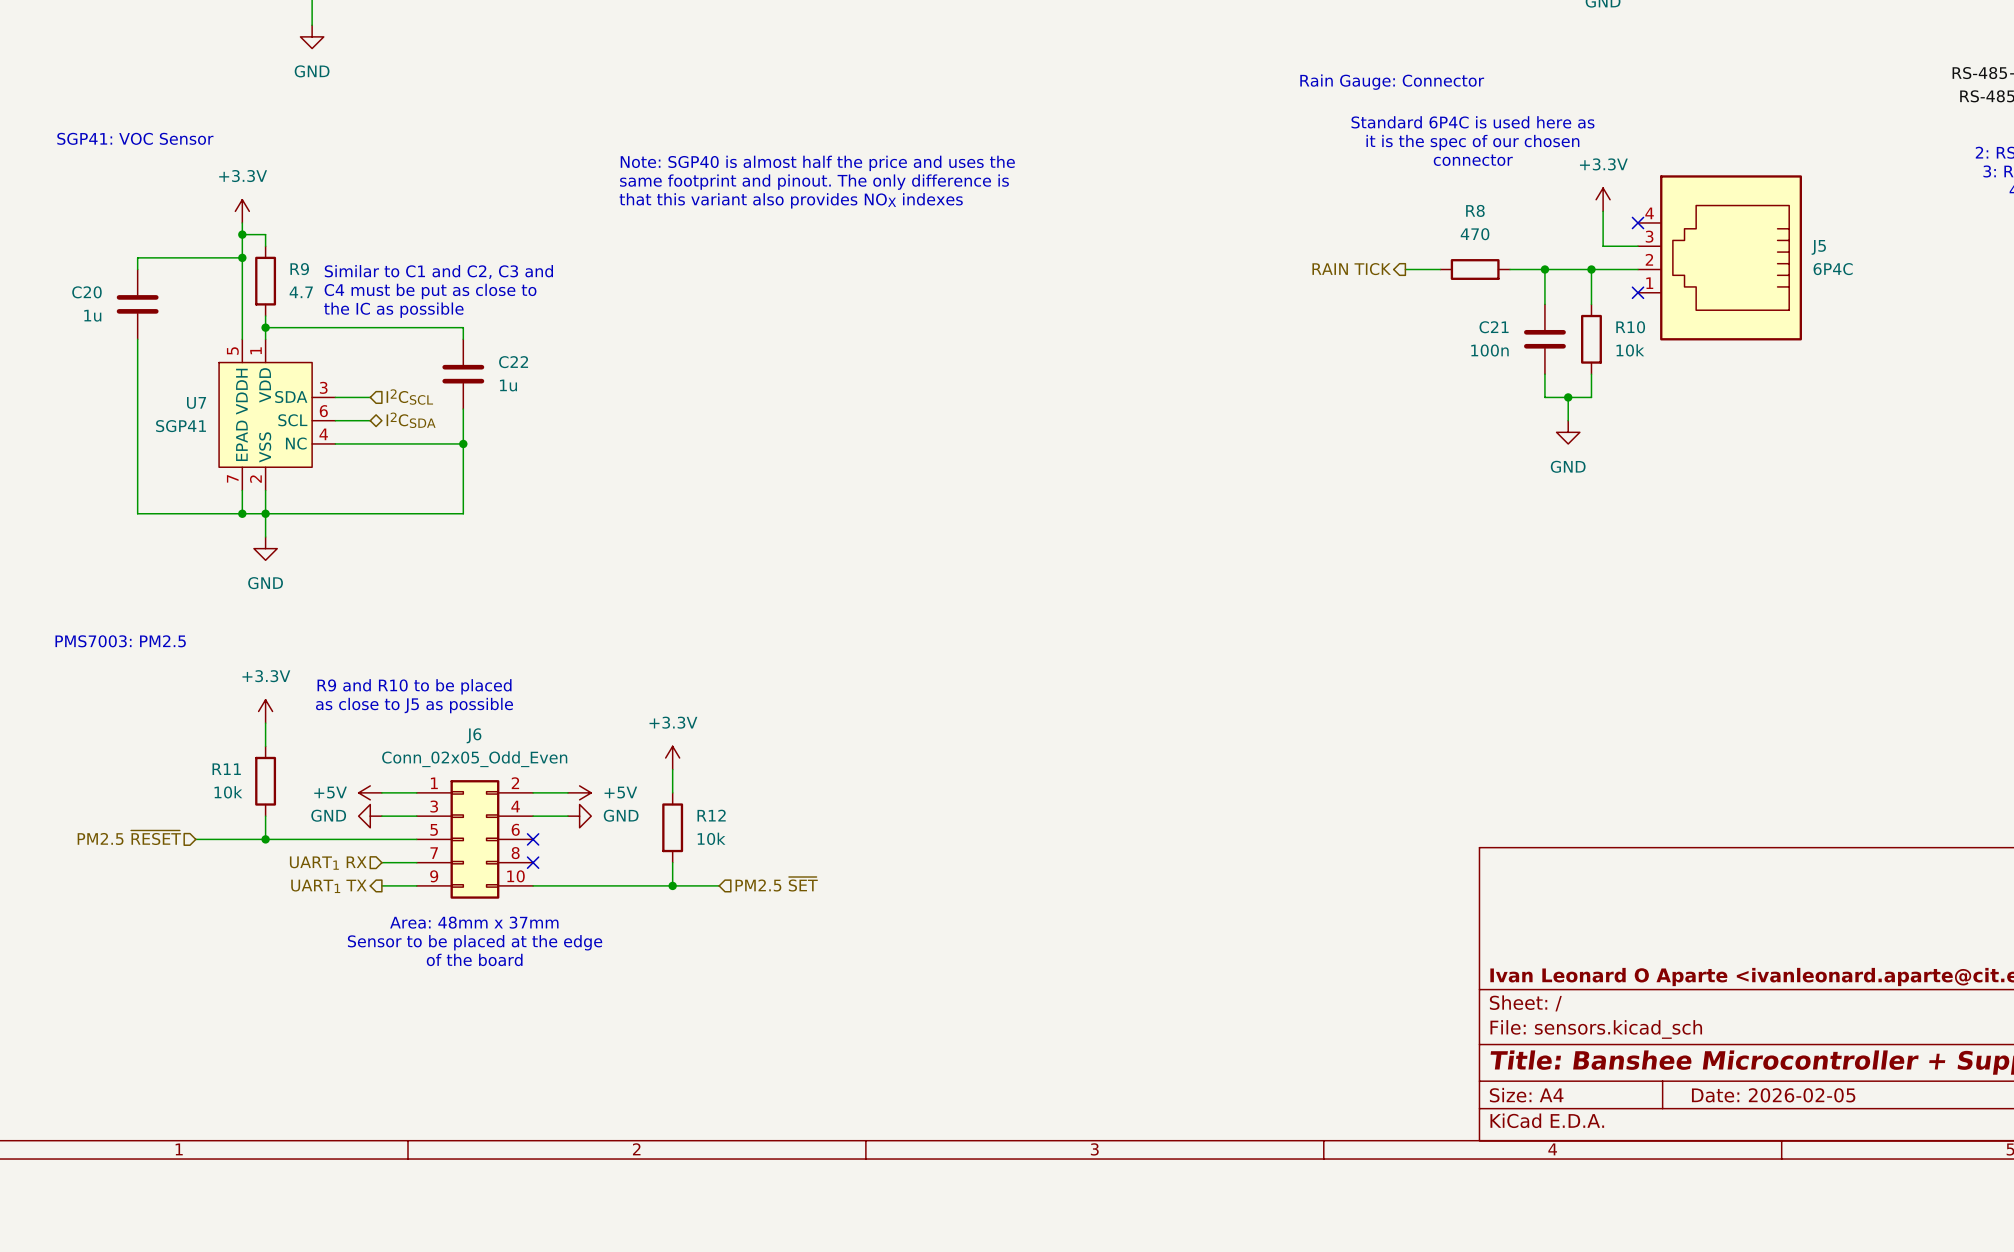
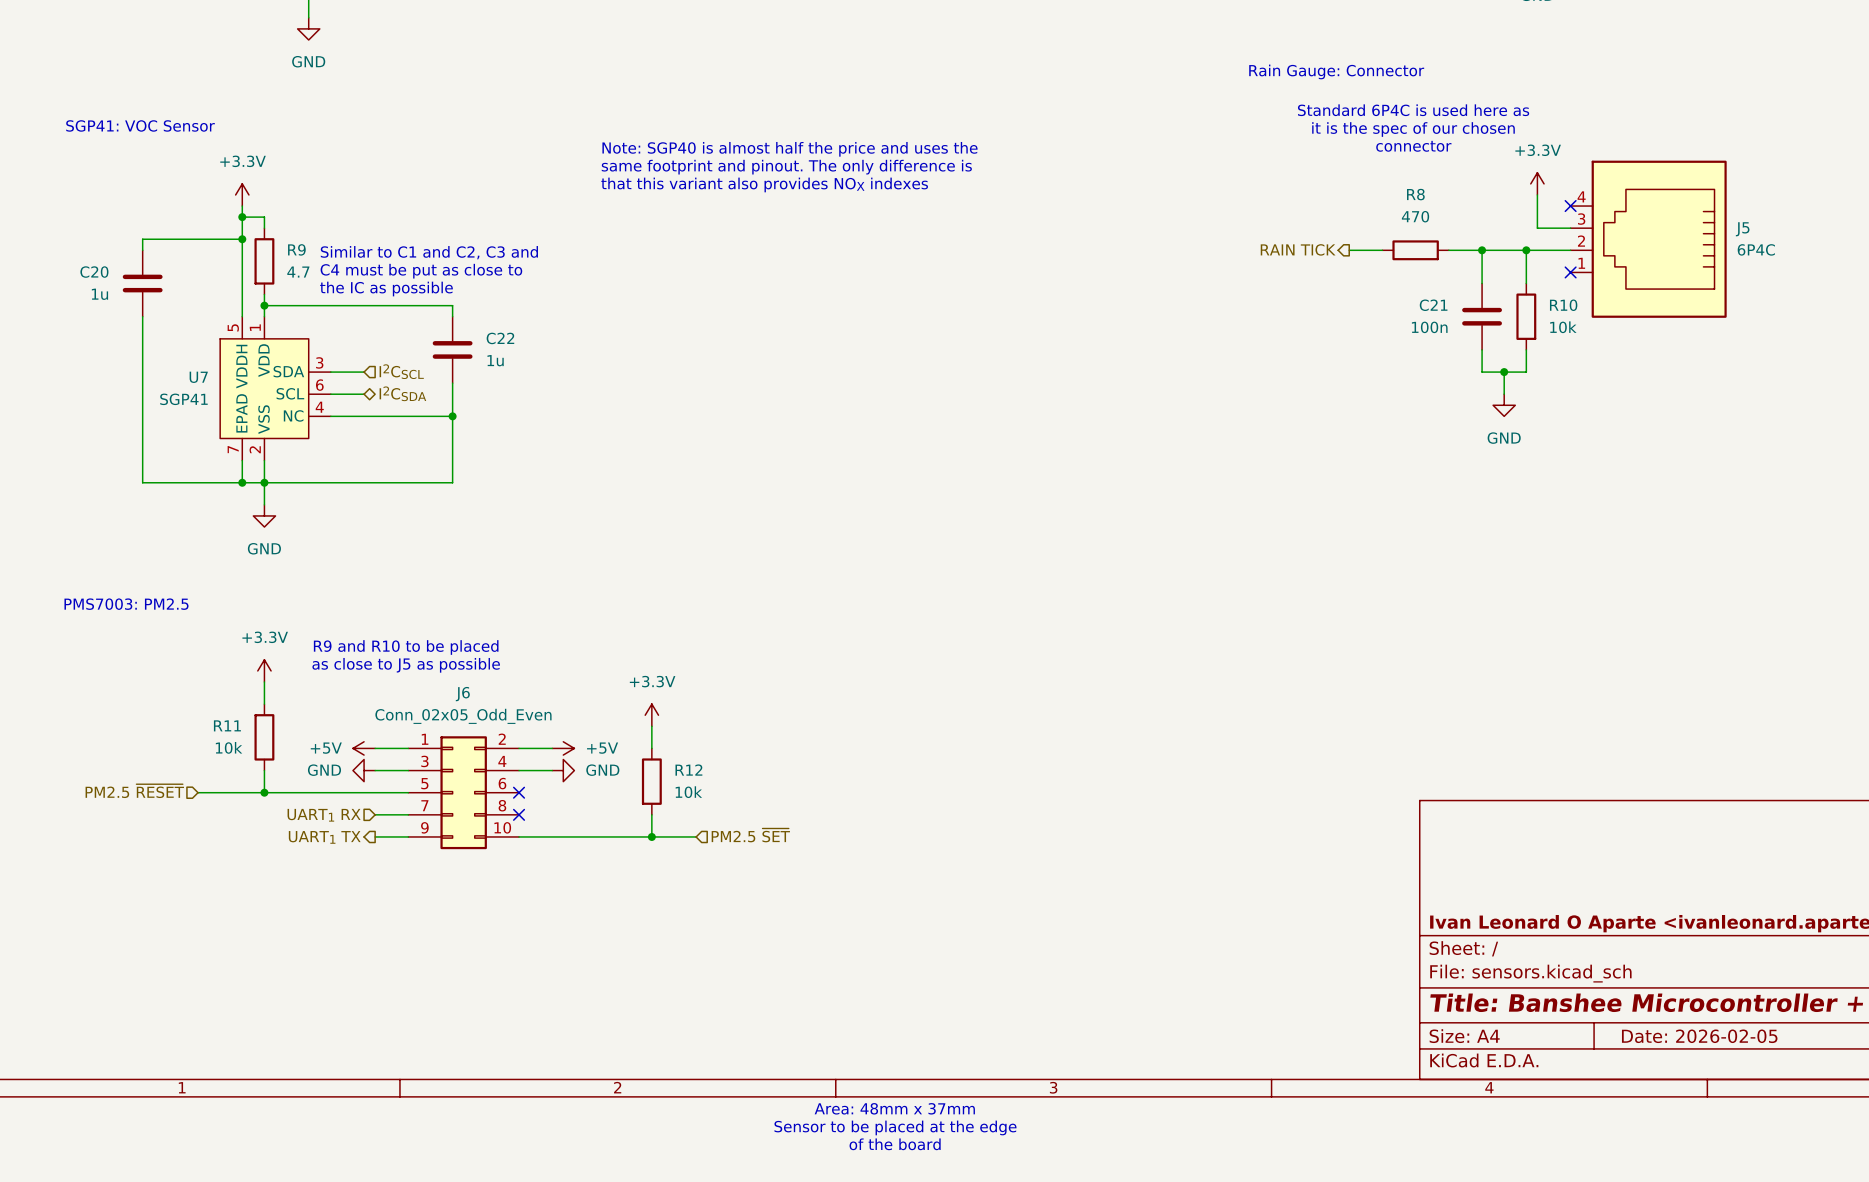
text: Area: 48mm x 37mm (474, 922) -> none
text: Sensor to be placed at the edge (475, 942) -> none
text: of the board (474, 959) -> none
text: none -> Area: 48mm x 37mm (894, 1108)
text: none -> Sensor to be placed at the edge (895, 1127)
text: none -> of the board (895, 1144)

